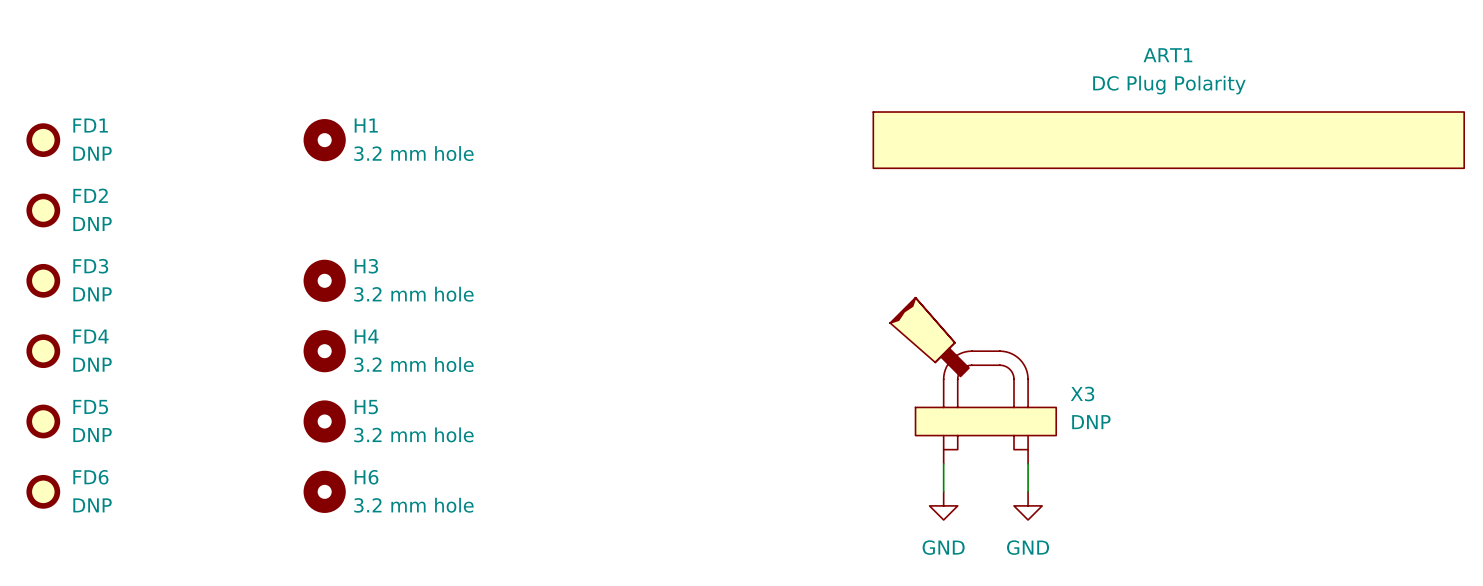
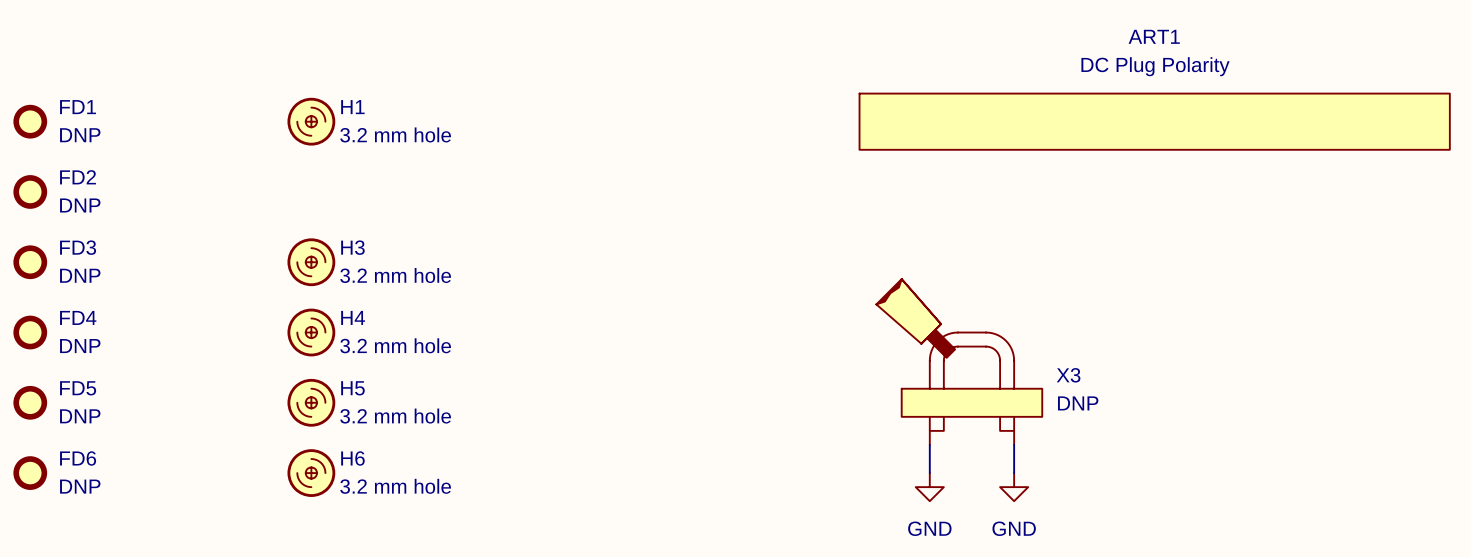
H1 symbol: [303, 119, 346, 162] -> [287, 97, 336, 146]
H3 symbol: [303, 259, 346, 302] -> [287, 238, 336, 287]
H4 symbol: [303, 330, 346, 373] -> [287, 308, 336, 357]
H5 symbol: [303, 400, 346, 443] -> [287, 378, 336, 427]
H6 symbol: [303, 470, 346, 513] -> [287, 449, 336, 497]

